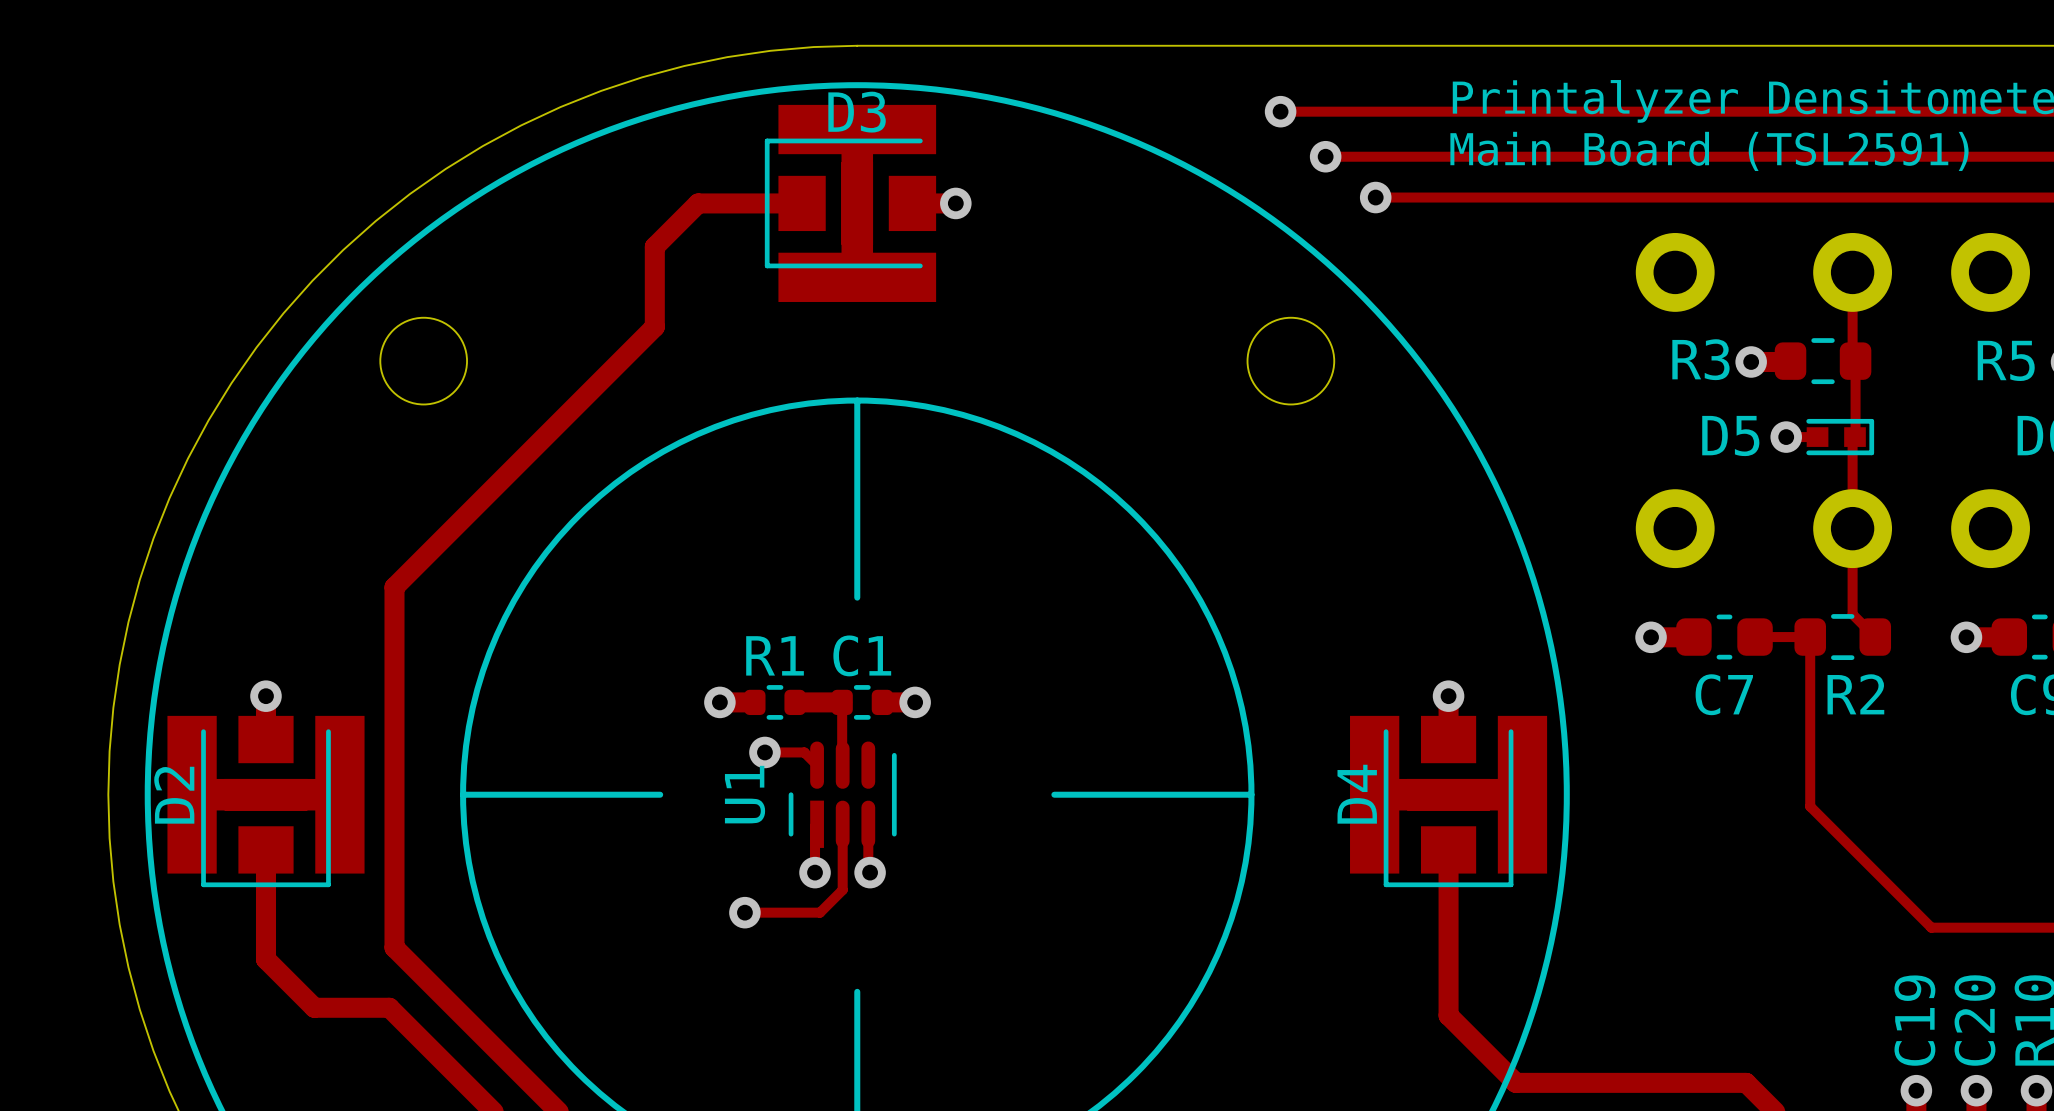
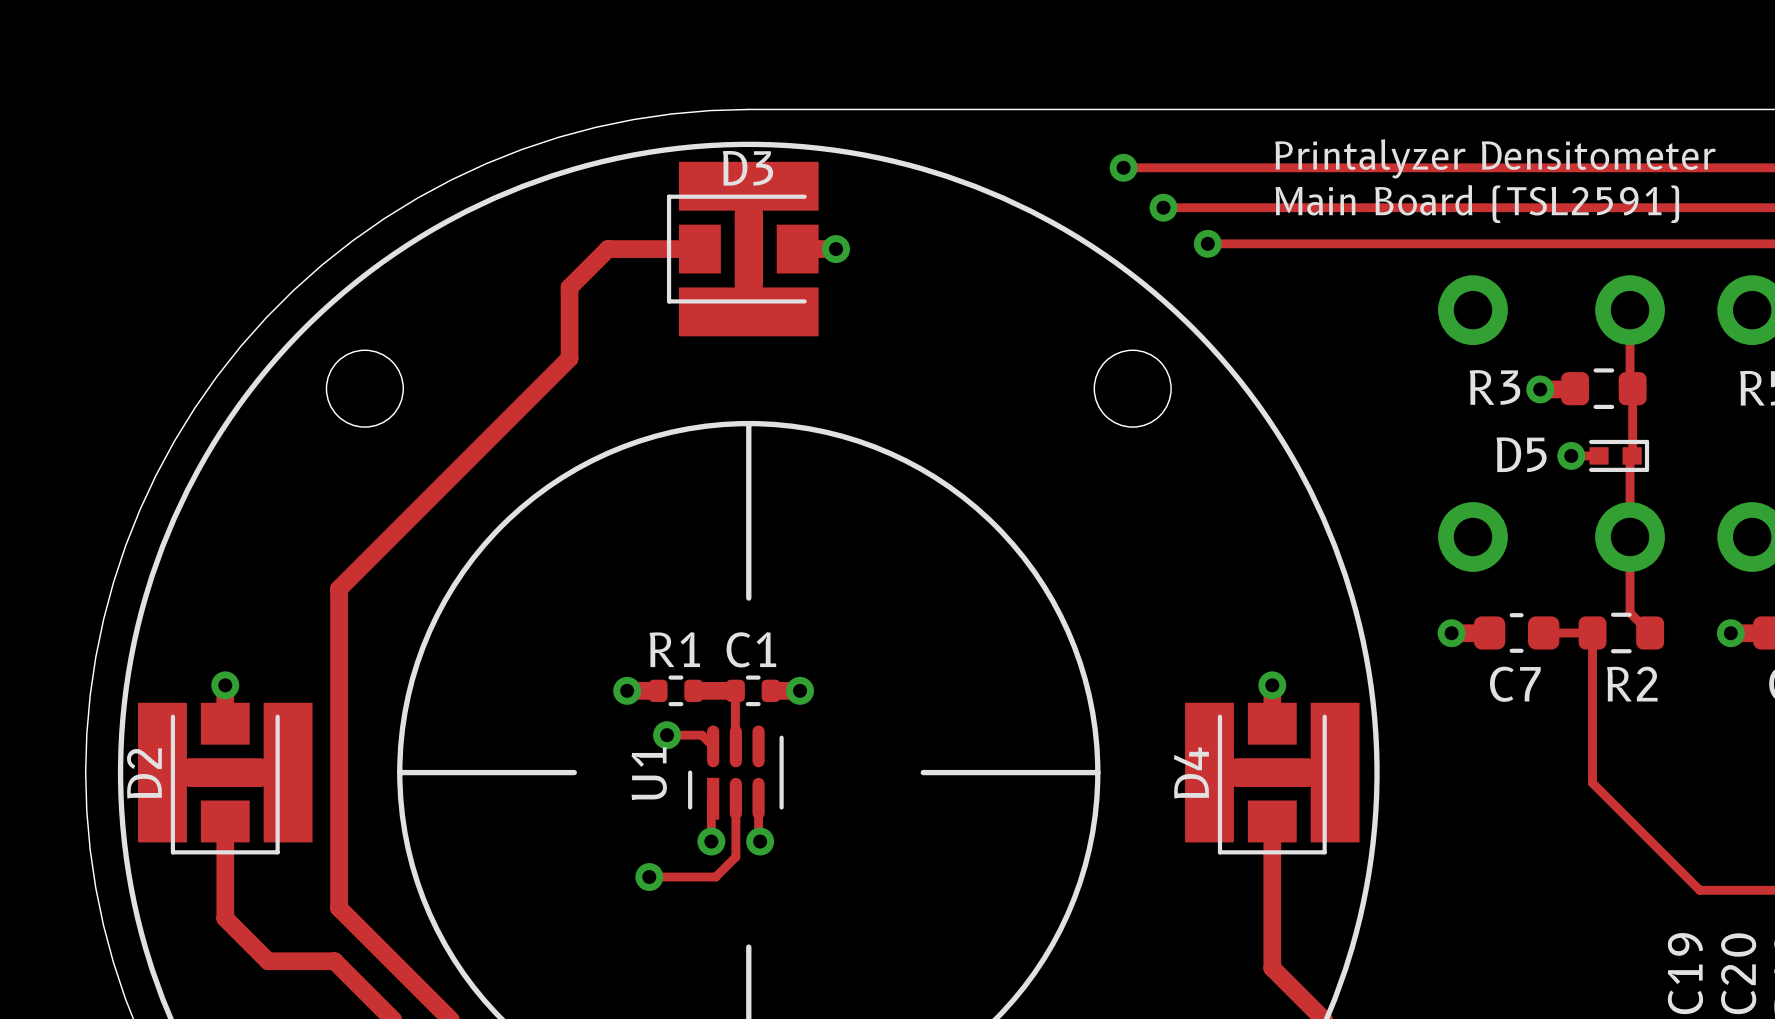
D3 footprint: [764, 104, 937, 302] -> [666, 161, 819, 337]
D2 footprint: [167, 715, 365, 888] -> [138, 702, 313, 855]
D4 footprint: [1350, 715, 1548, 888] -> [1185, 702, 1360, 855]

